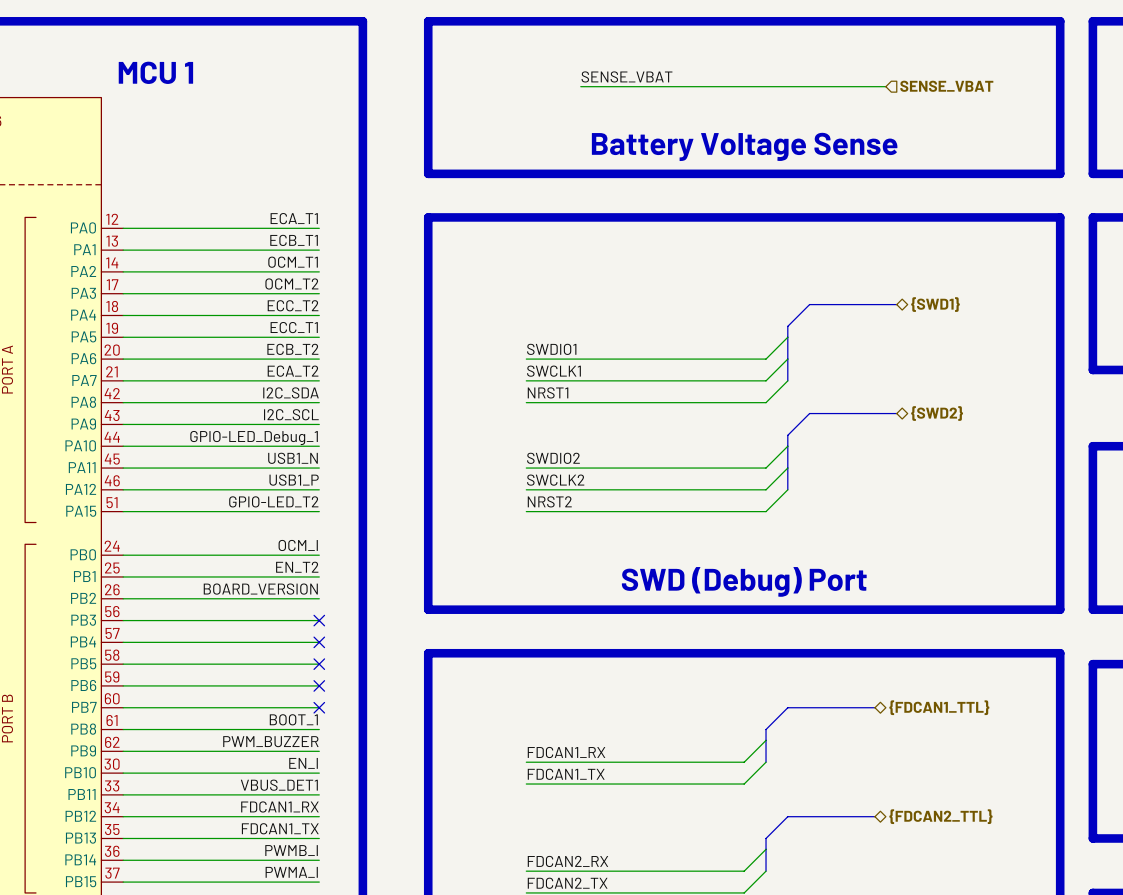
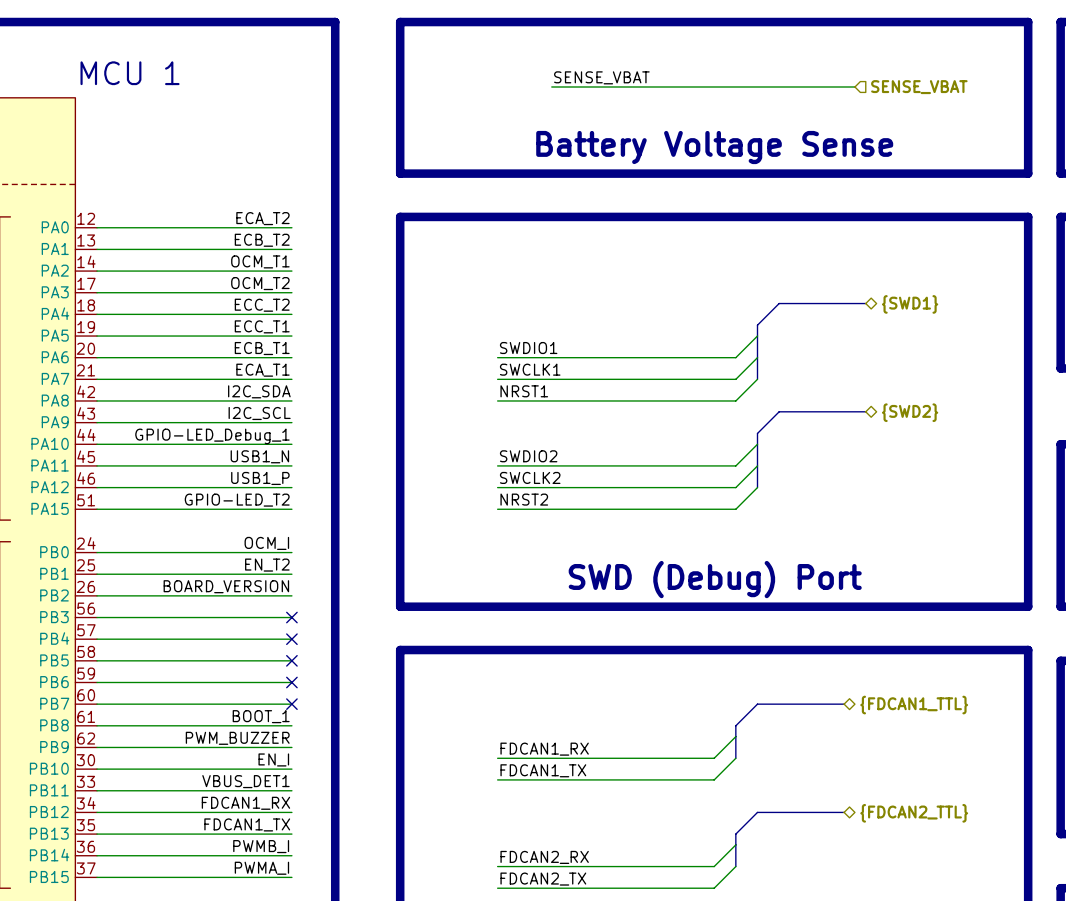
label: ECA_T1 (294, 218) -> ECA_T2 (262, 218)
label: ECB_T1 (294, 240) -> ECB_T2 (262, 240)
label: ECB_T2 (292, 349) -> ECB_T1 (262, 348)
label: ECA_T2 (293, 371) -> ECA_T1 (262, 370)

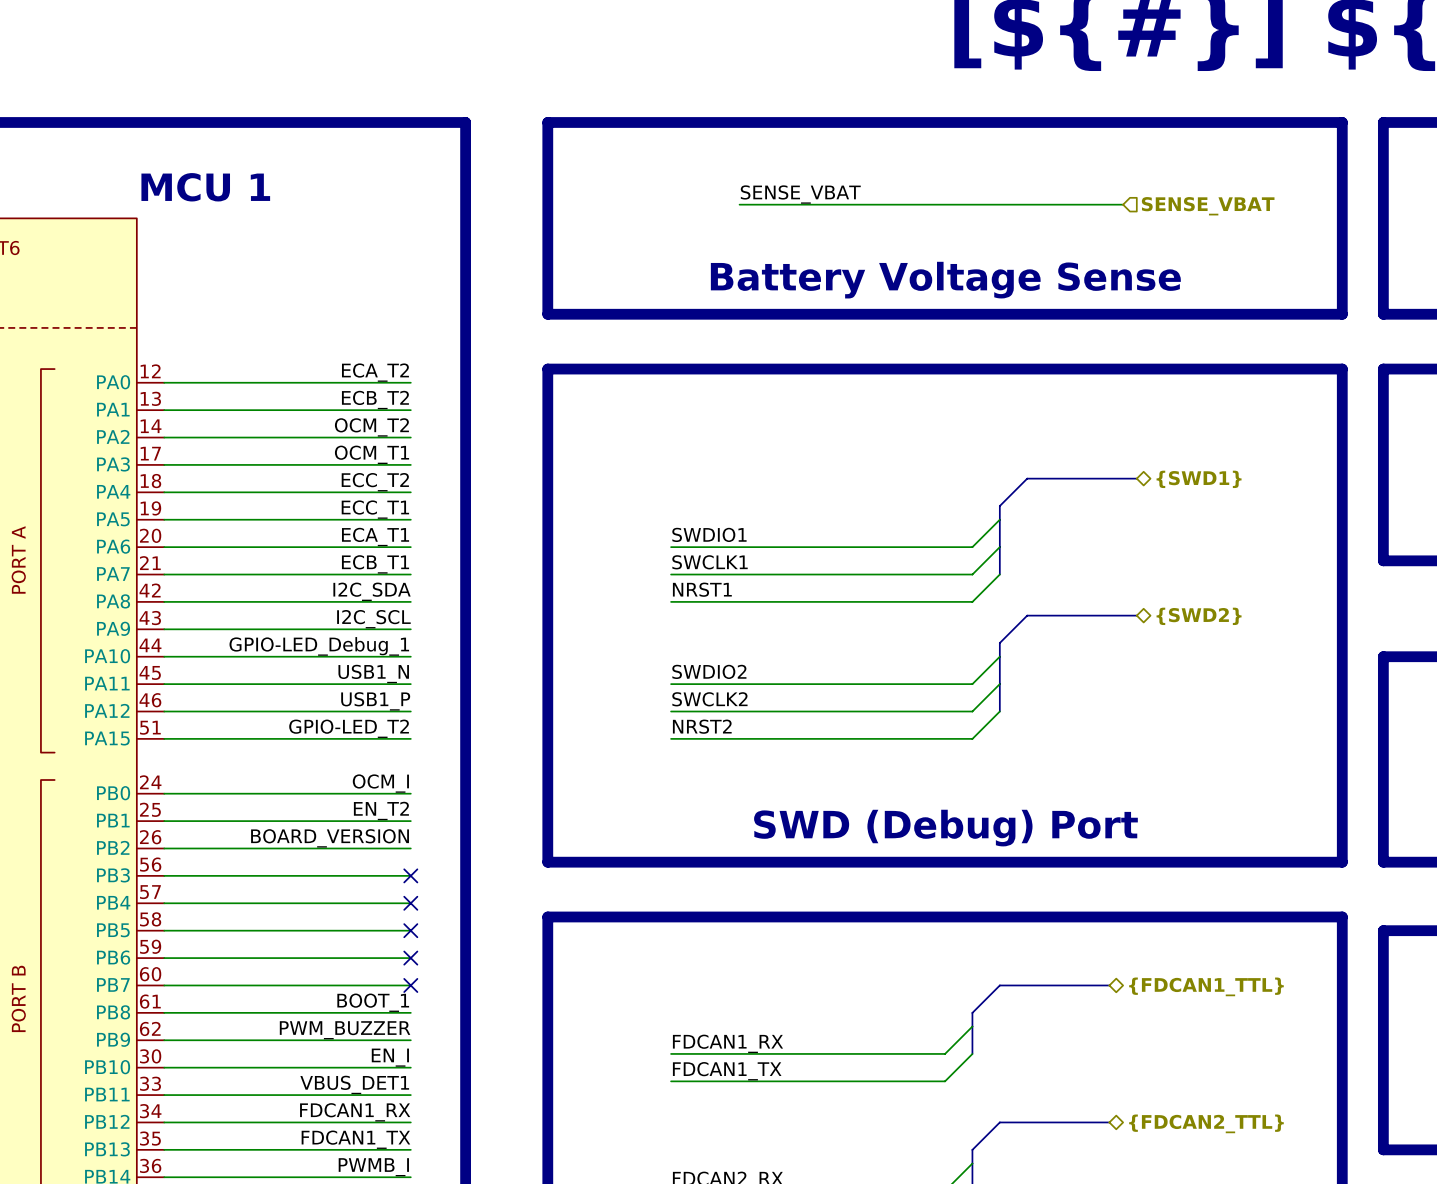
label: OCM_T1 (260, 261) -> OCM_T2 (371, 427)
label: OCM_T2 (260, 283) -> OCM_T1 (371, 454)
label: ECB_T1 (262, 348) -> ECA_T1 (375, 536)
label: ECA_T1 (262, 370) -> ECB_T1 (375, 564)

